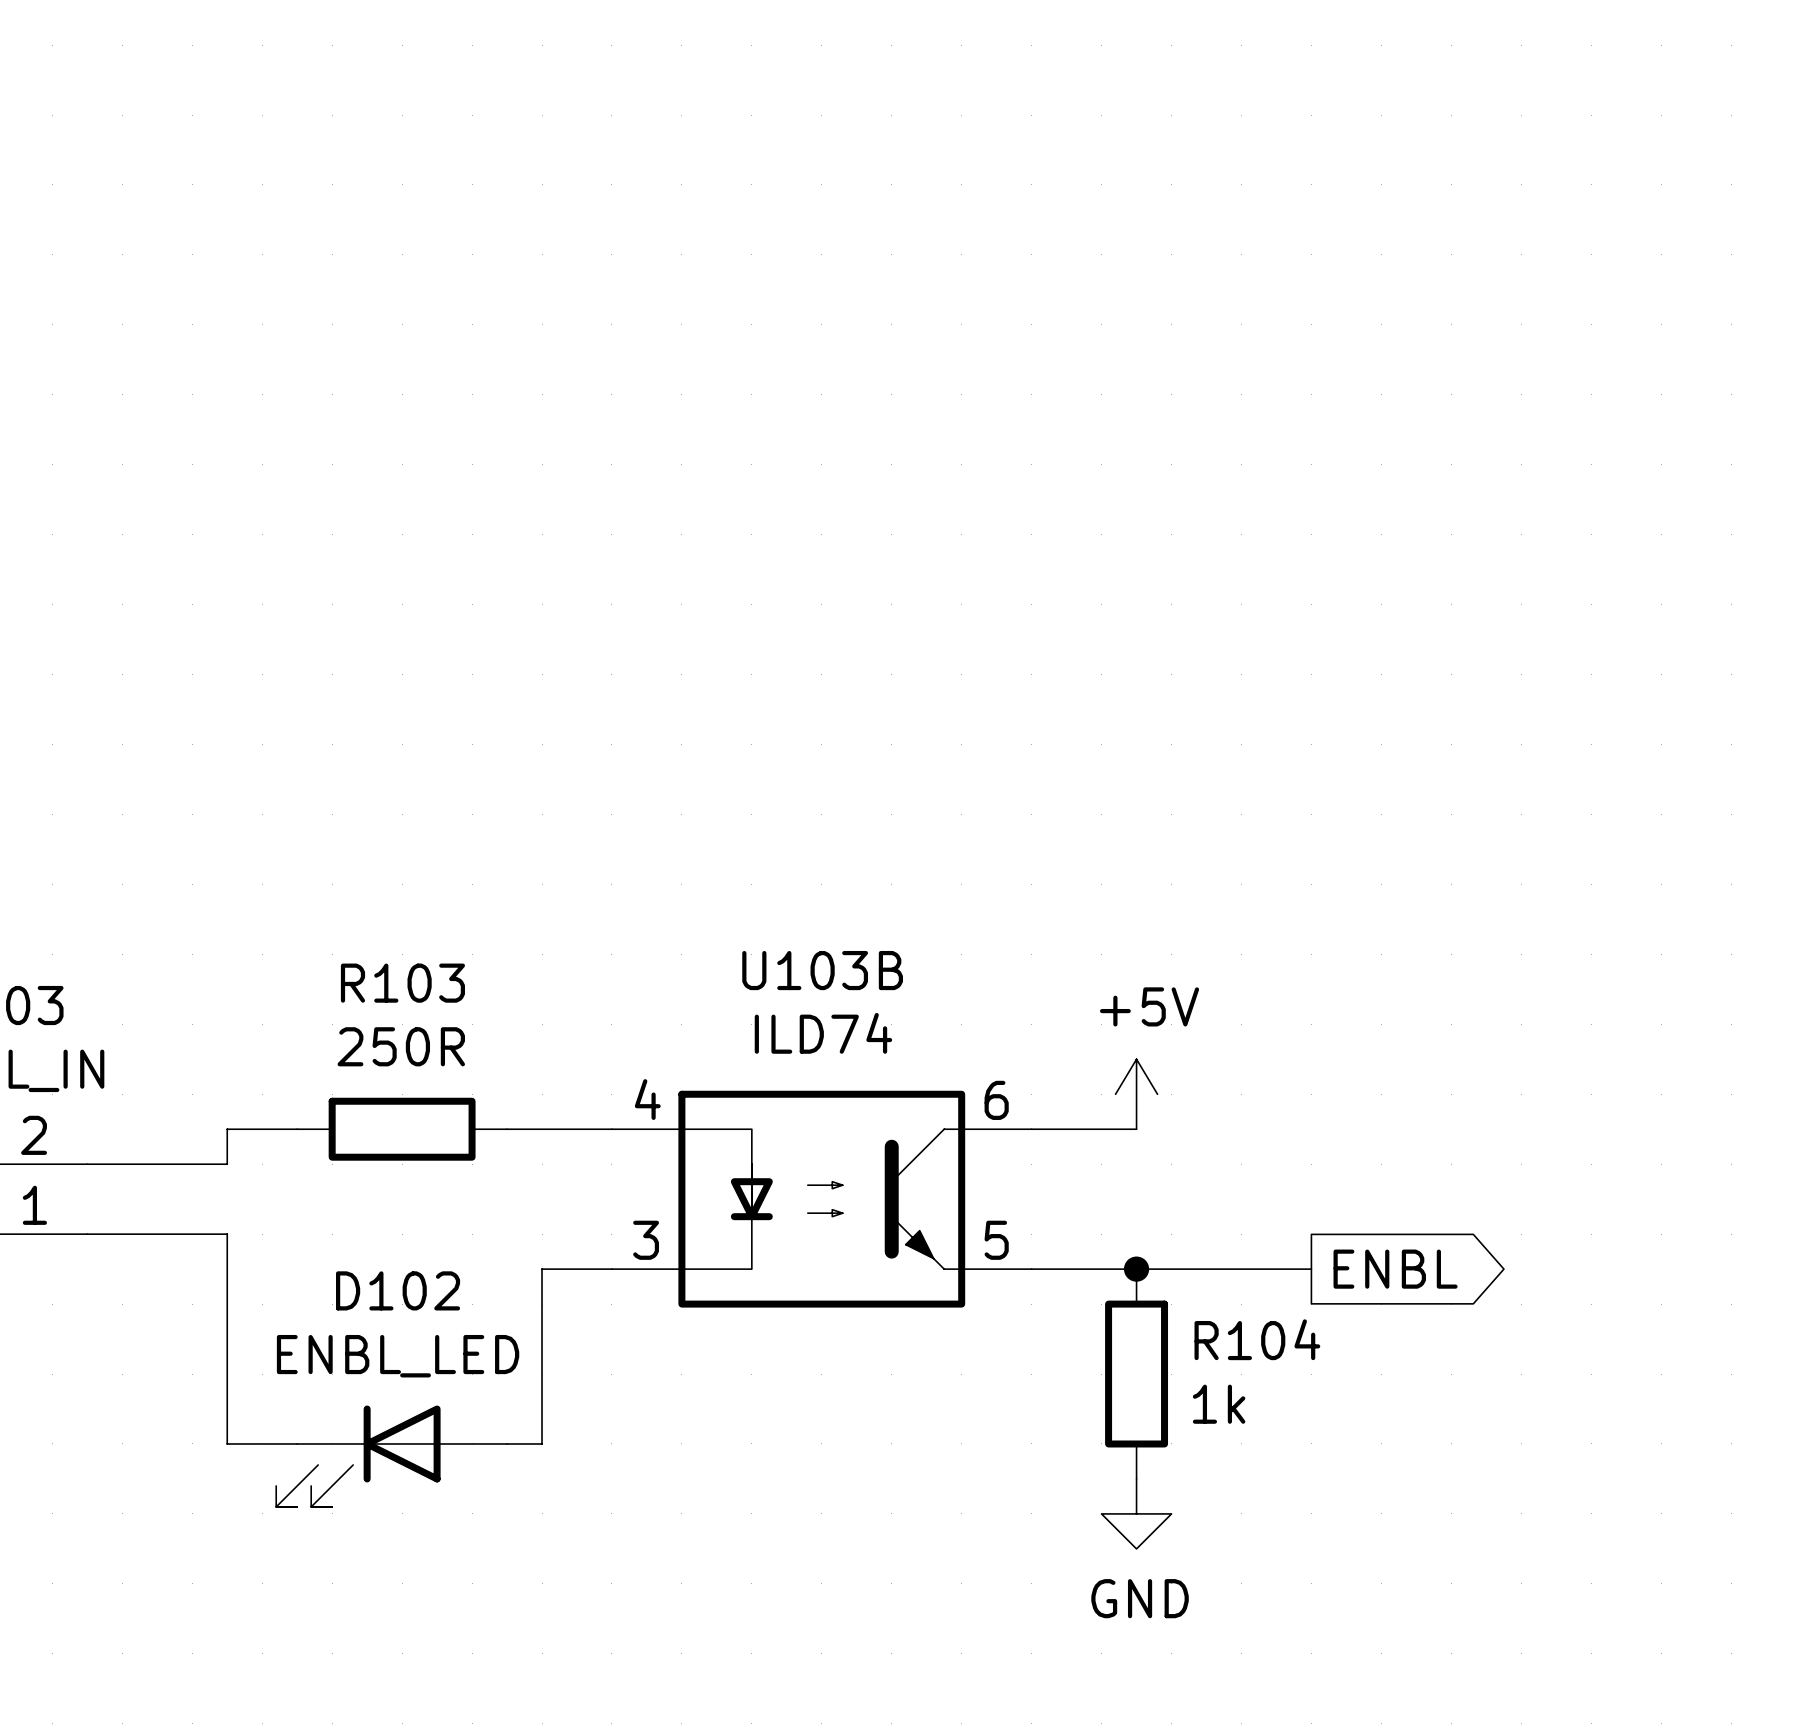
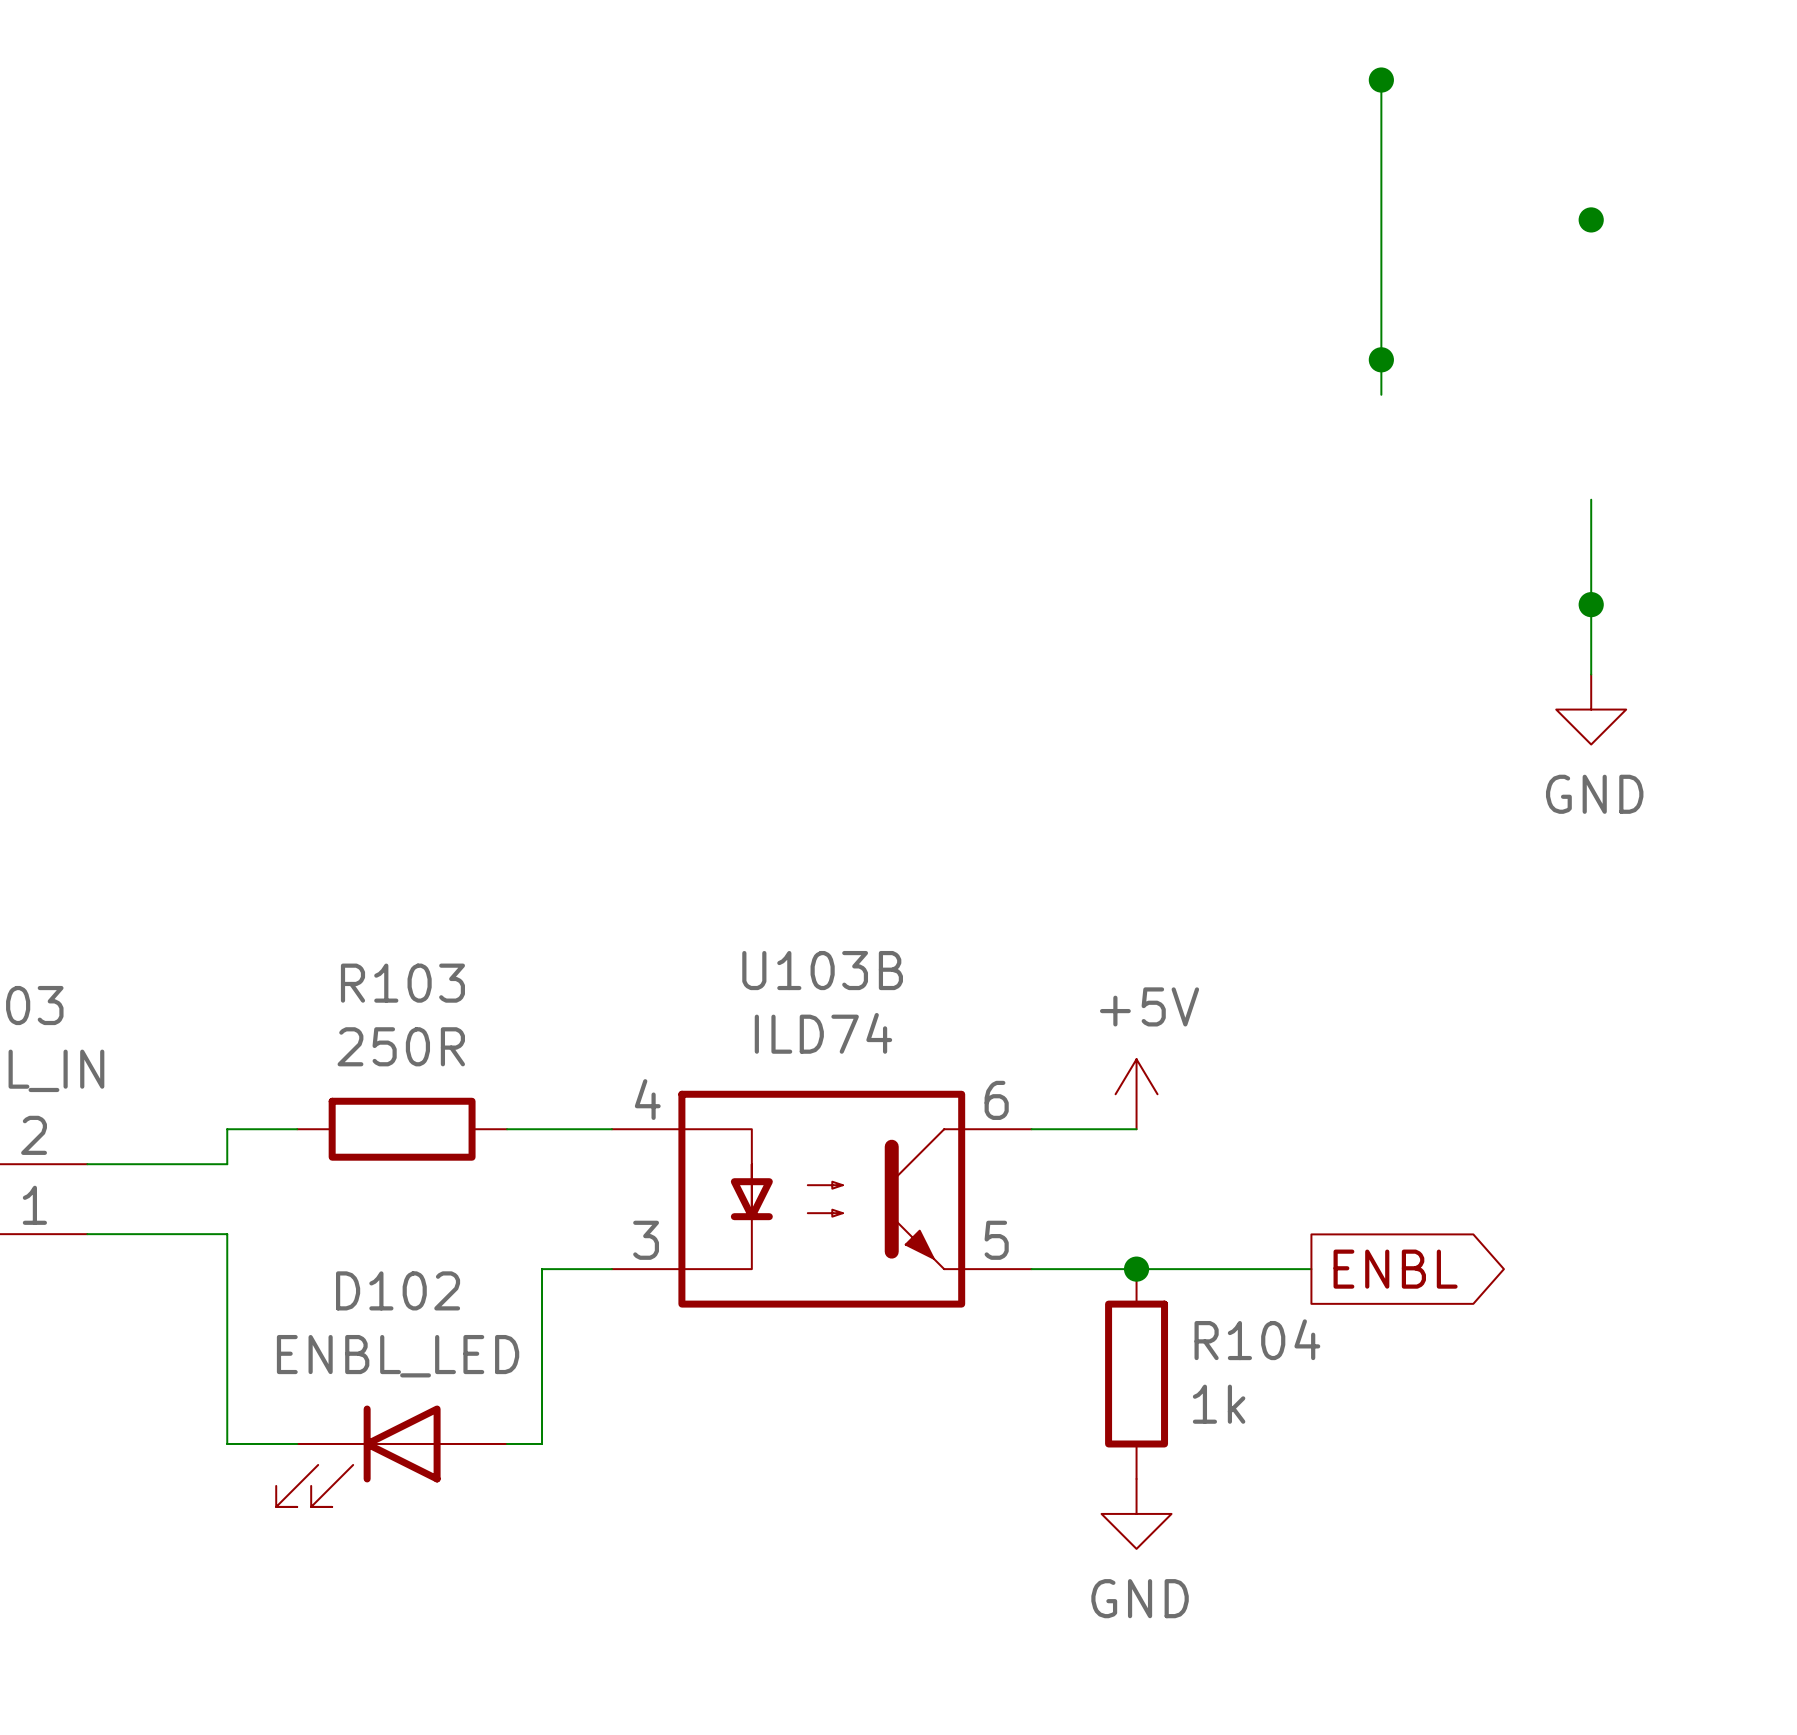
wire: none -> (1381, 80) (1381, 394)
junction: none -> (1381, 80)
junction: none -> (1591, 219)
junction: none -> (1381, 359)
wire: none -> (1591, 499) (1591, 674)
junction: none -> (1591, 604)
power symbol: none -> GND (1591, 709)

